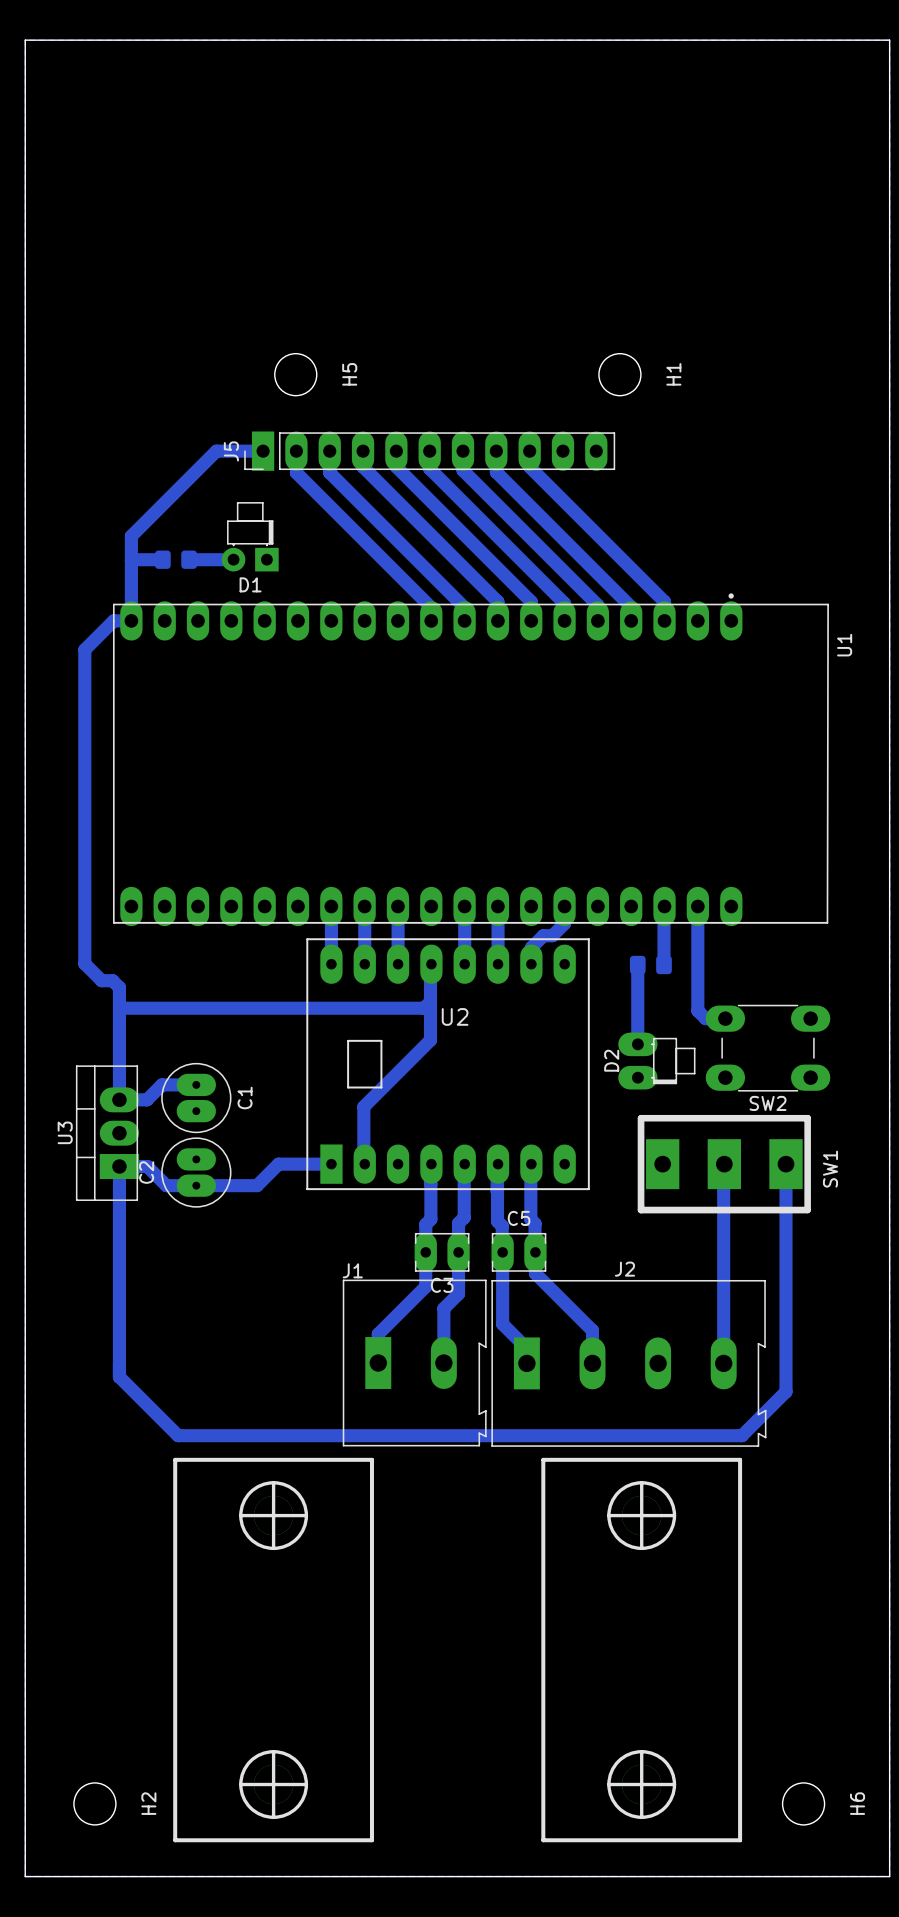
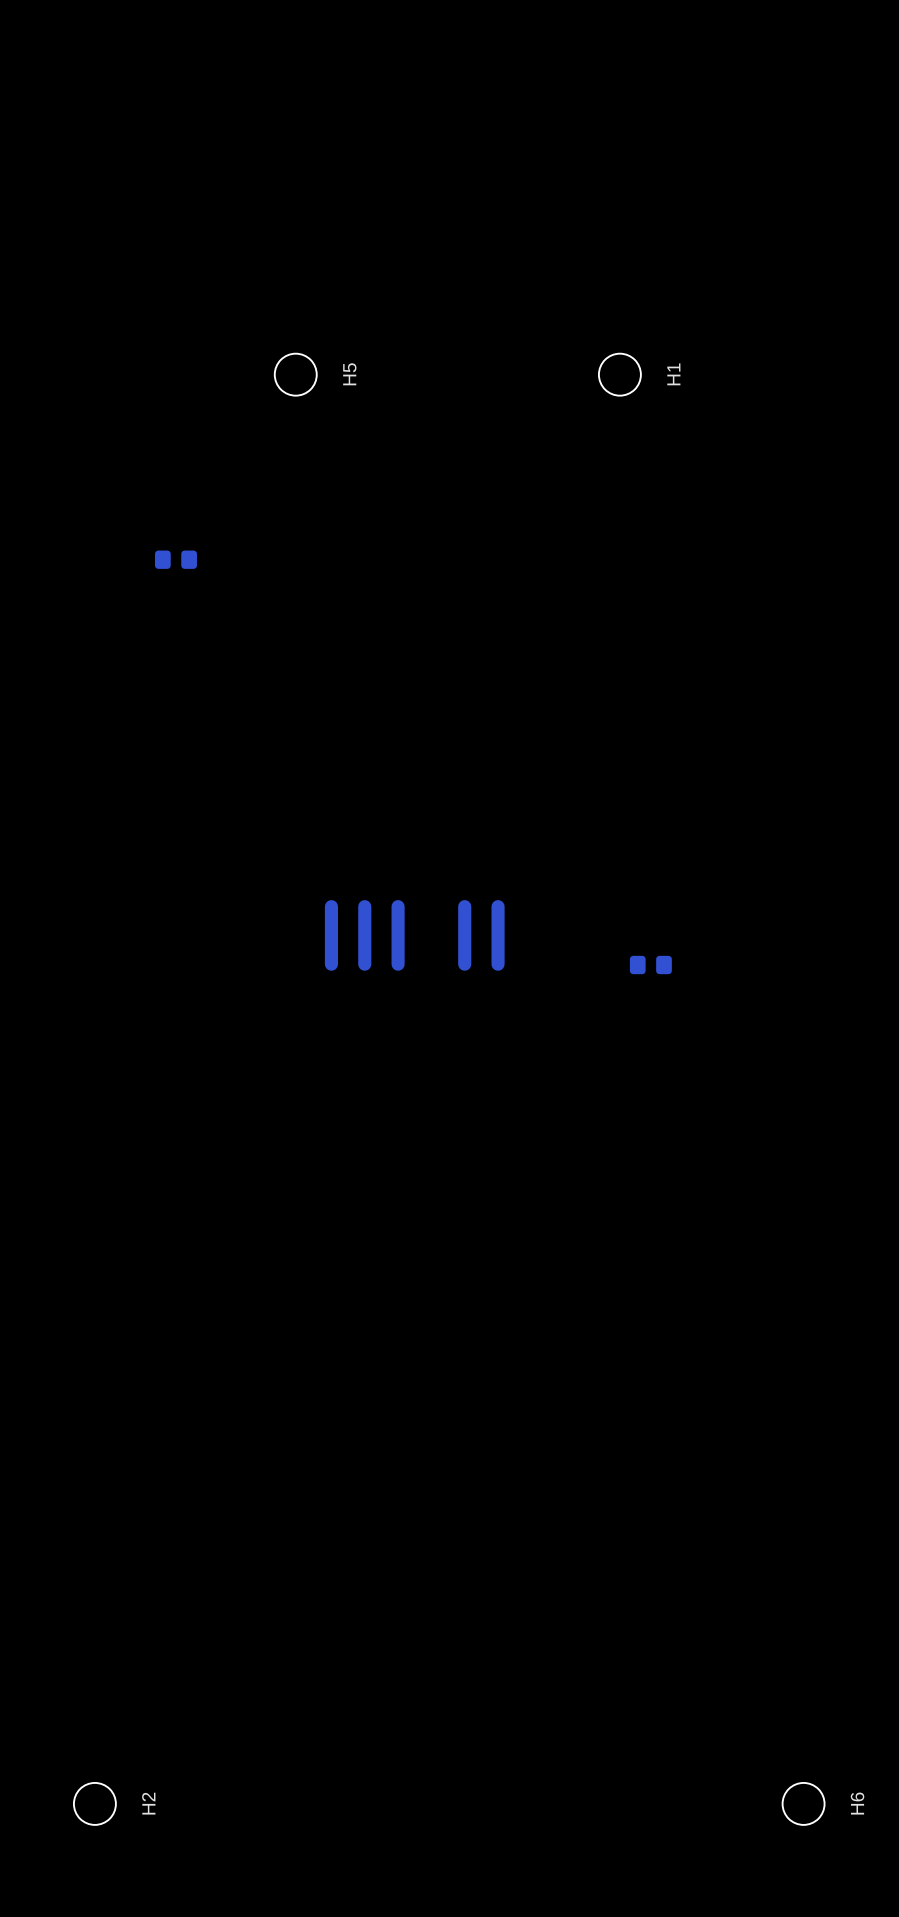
board edge: (25, 40) (25, 1876) (889, 1876) (889, 40) (25, 40) -> none
bottom track: (263, 451) (216, 451) (131, 536) (131, 620) (113, 620) (84, 649) (84, 963) (101, 980) (112, 980) (119, 987) (119, 1099) (147, 1099) (161, 1084) (196, 1084) -> none
bottom track: (296, 451) (296, 472) (431, 607) (431, 620) -> none
bottom track: (329, 451) (329, 472) (464, 607) (464, 620) -> none
bottom track: (363, 451) (363, 466) (497, 601) (497, 620) -> none
bottom track: (396, 451) (396, 466) (531, 601) (531, 620) -> none
bottom track: (429, 451) (429, 468) (564, 603) (564, 620) -> none
J5: (429, 451) -> none
bottom track: (463, 451) (463, 470) (597, 605) (597, 620) (597, 606) -> none
bottom track: (496, 451) (496, 472) (631, 607) (631, 620) -> none
bottom track: (529, 451) (529, 466) (664, 601) (664, 620) -> none
D1: (250, 536) -> none
bottom track: (162, 559) (131, 560) -> none
bottom track: (189, 559) (233, 559) -> none
U1: (470, 759) -> none
bottom track: (564, 906) (564, 923) (552, 935) (543, 935) (531, 947) (531, 964) -> none
bottom track: (664, 906) (664, 965) -> none
bottom track: (697, 906) (697, 1010) (705, 1018) (725, 1018) -> none
bottom track: (430, 964) (430, 1040) (363, 1106) (363, 1164) -> none
bottom track: (637, 965) (637, 1044) -> none
bottom track: (430, 1001) (423, 1008) (119, 1008) -> none
SW2: (768, 1048) -> none
D2: (656, 1061) -> none
U2: (448, 1064) -> none
C1: (196, 1098) -> none
U3: (107, 1133) -> none
bottom track: (330, 1163) (278, 1164) (257, 1185) (166, 1185) (147, 1166) (119, 1166) (119, 1377) (178, 1435) (742, 1435) (786, 1391) (786, 1164) -> none
bottom track: (430, 1164) (430, 1219) (425, 1224) (425, 1286) (378, 1334) (378, 1363) -> none
bottom track: (463, 1164) (464, 1217) (458, 1223) (458, 1293) (443, 1308) (443, 1363) -> none
bottom track: (530, 1164) (530, 1219) (535, 1223) (535, 1252) -> none
bottom track: (724, 1164) (723, 1363) -> none
SW1: (724, 1164) -> none
C2: (196, 1172) -> none
bottom track: (497, 1183) (497, 1221) (502, 1226) (502, 1265) -> none
bottom track: (502, 1238) (502, 1324) (526, 1348) (526, 1363) -> none
bottom track: (535, 1241) (535, 1273) (592, 1330) (592, 1363) -> none
C3: (442, 1252) -> none
C5: (519, 1252) -> none
J1: (414, 1363) -> none
J2: (628, 1363) -> none
part: (273, 1650) -> none
part: (641, 1650) -> none

